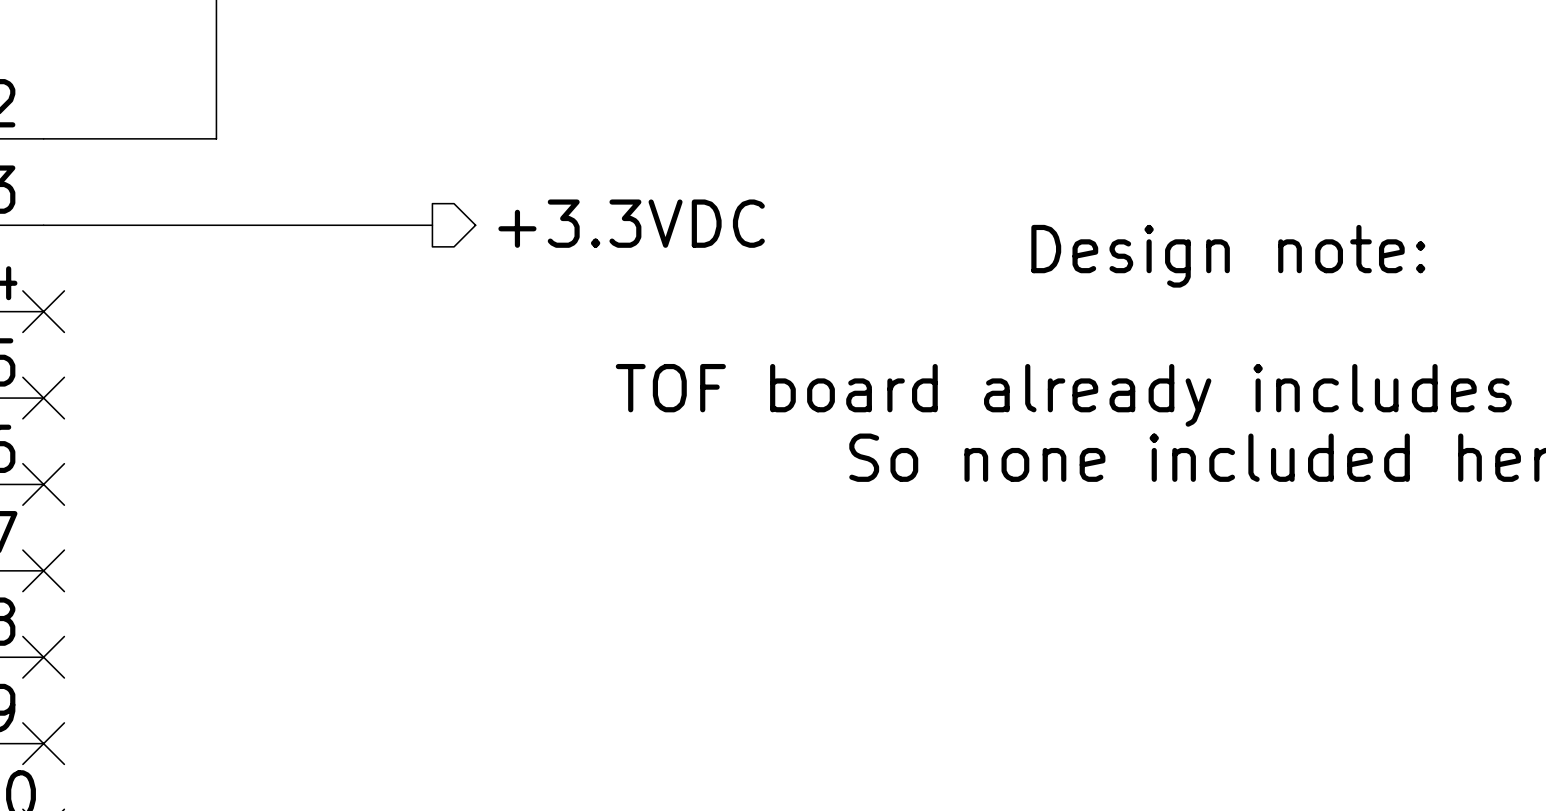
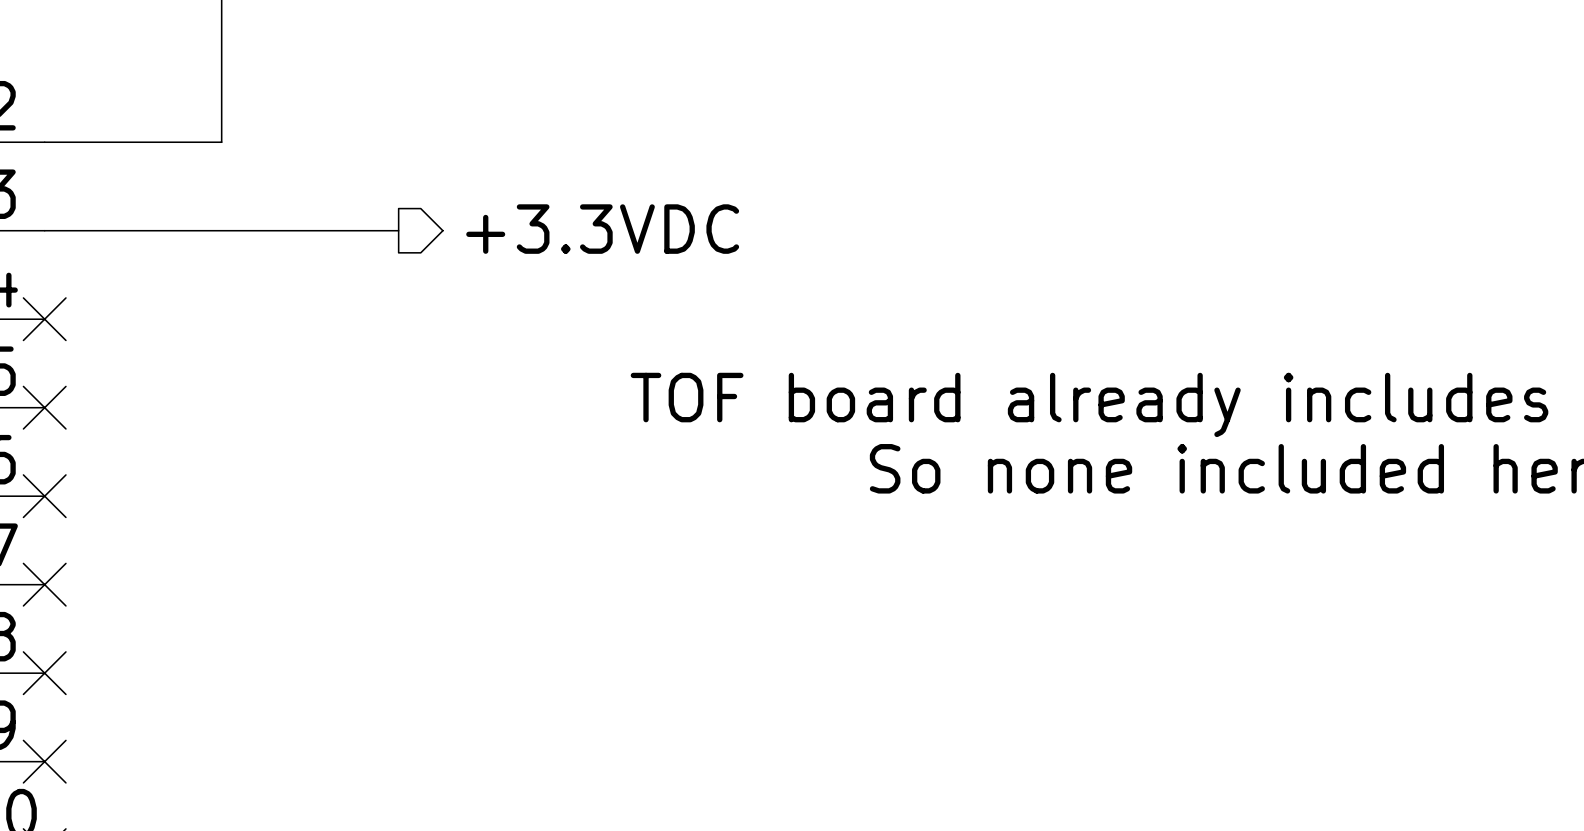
hierarchical label position: +3.3VDC (631, 223) -> +3.3VDC (602, 229)
wire: (389, 225) (432, 225) -> none
text: Design note: (1228, 256) -> none

